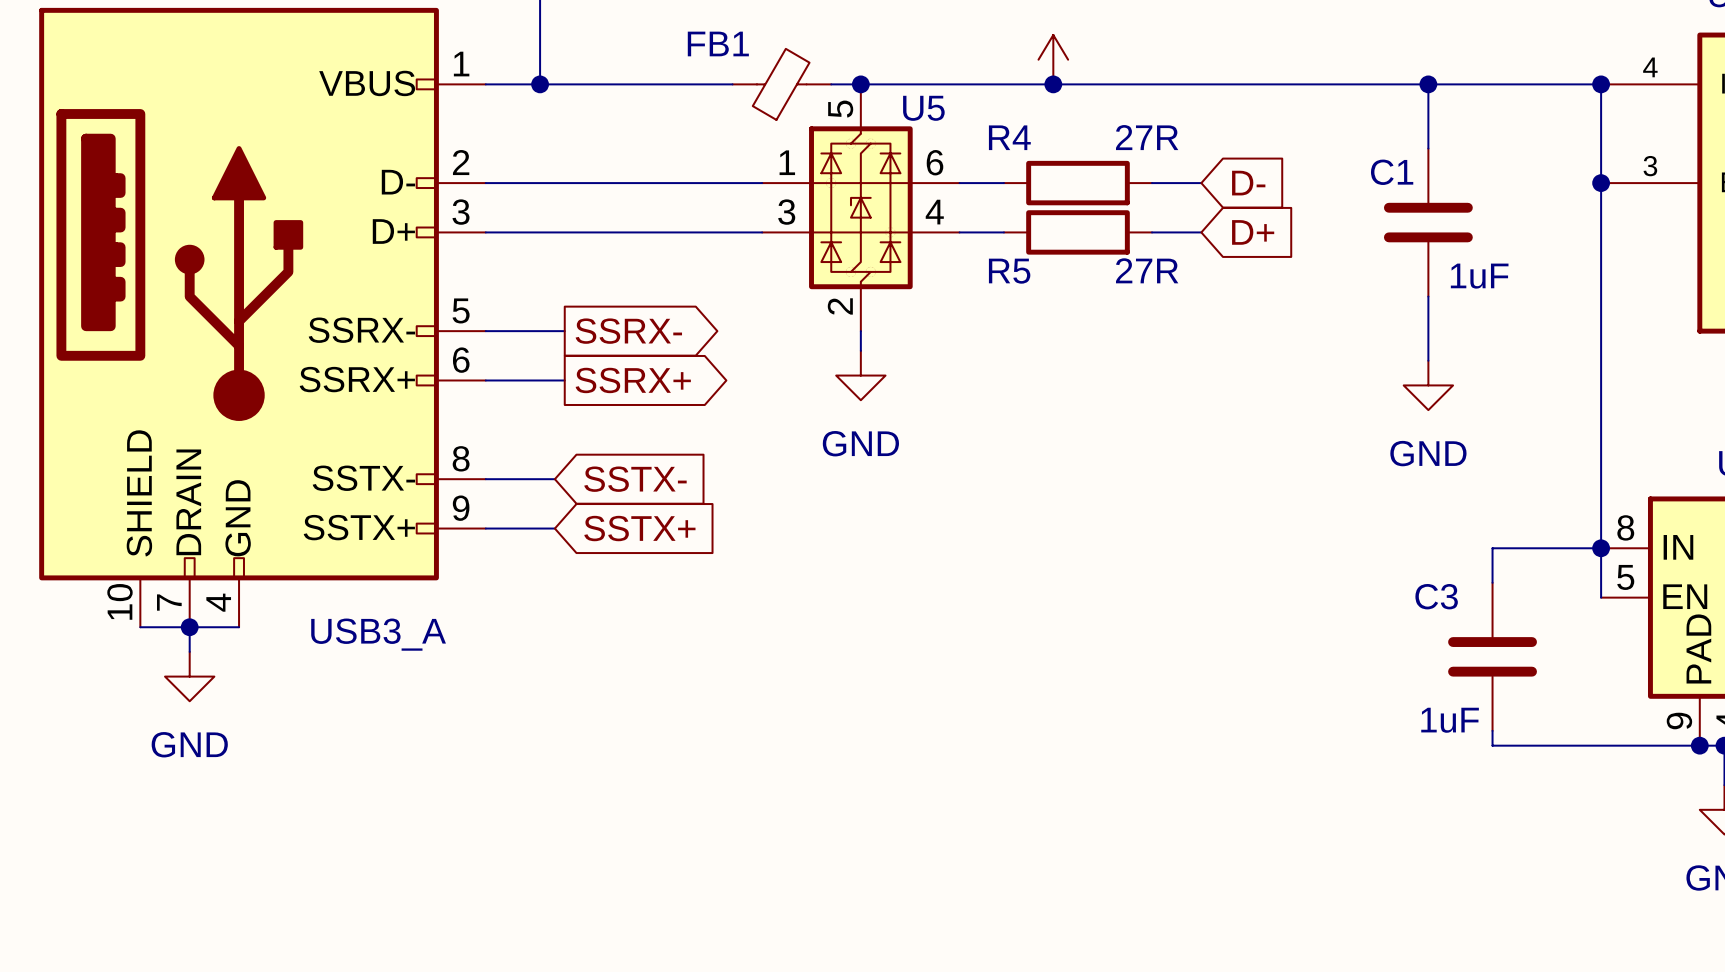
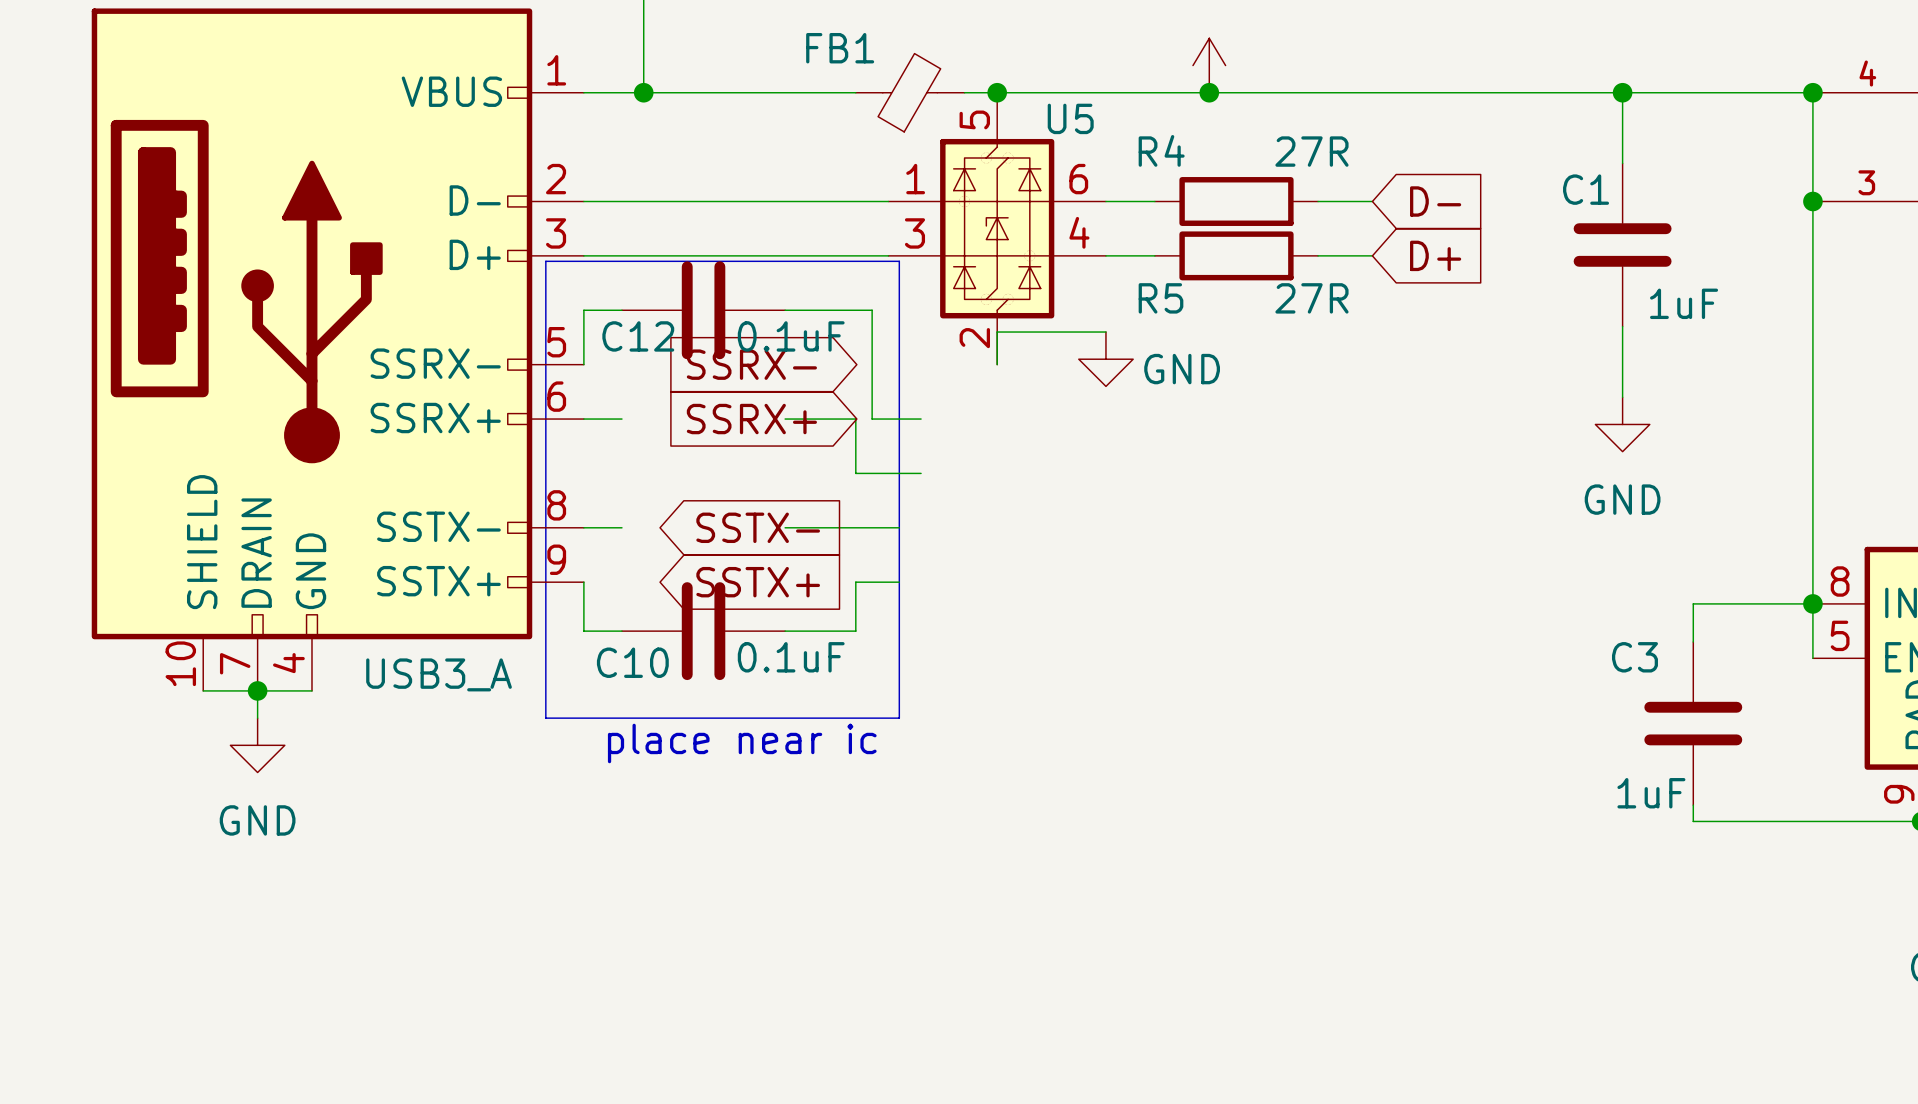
line: none -> (545, 261) (899, 261) (899, 718) (545, 718) (545, 261)
C12: none -> 0.1uF (703, 310)
wire: none -> (785, 310) (872, 310) (872, 419) (921, 419)
wire: (485, 331) (564, 331) -> (583, 364) (583, 310) (621, 310)
wire: (860, 331) (860, 350) -> (997, 364) (997, 332) (1105, 332)
power symbol position: GND (860, 375) -> GND (1105, 359)
wire: (520, 380) (564, 380) -> none
wire: none -> (785, 419) (855, 419) (855, 473) (921, 473)
power symbol text position: GND (860, 443) -> GND (1182, 369)
wire: (520, 479) (554, 479) -> none
wire: none -> (785, 527) (899, 527)
wire: (485, 528) (554, 528) -> (583, 582) (583, 631) (621, 631)
wire: none -> (899, 582) (855, 582) (855, 631) (785, 631)
C10: none -> 0.1uF (703, 631)
part value position: USB3_A (378, 634) -> USB3_A (439, 674)
text: none -> place near ic (742, 743)

